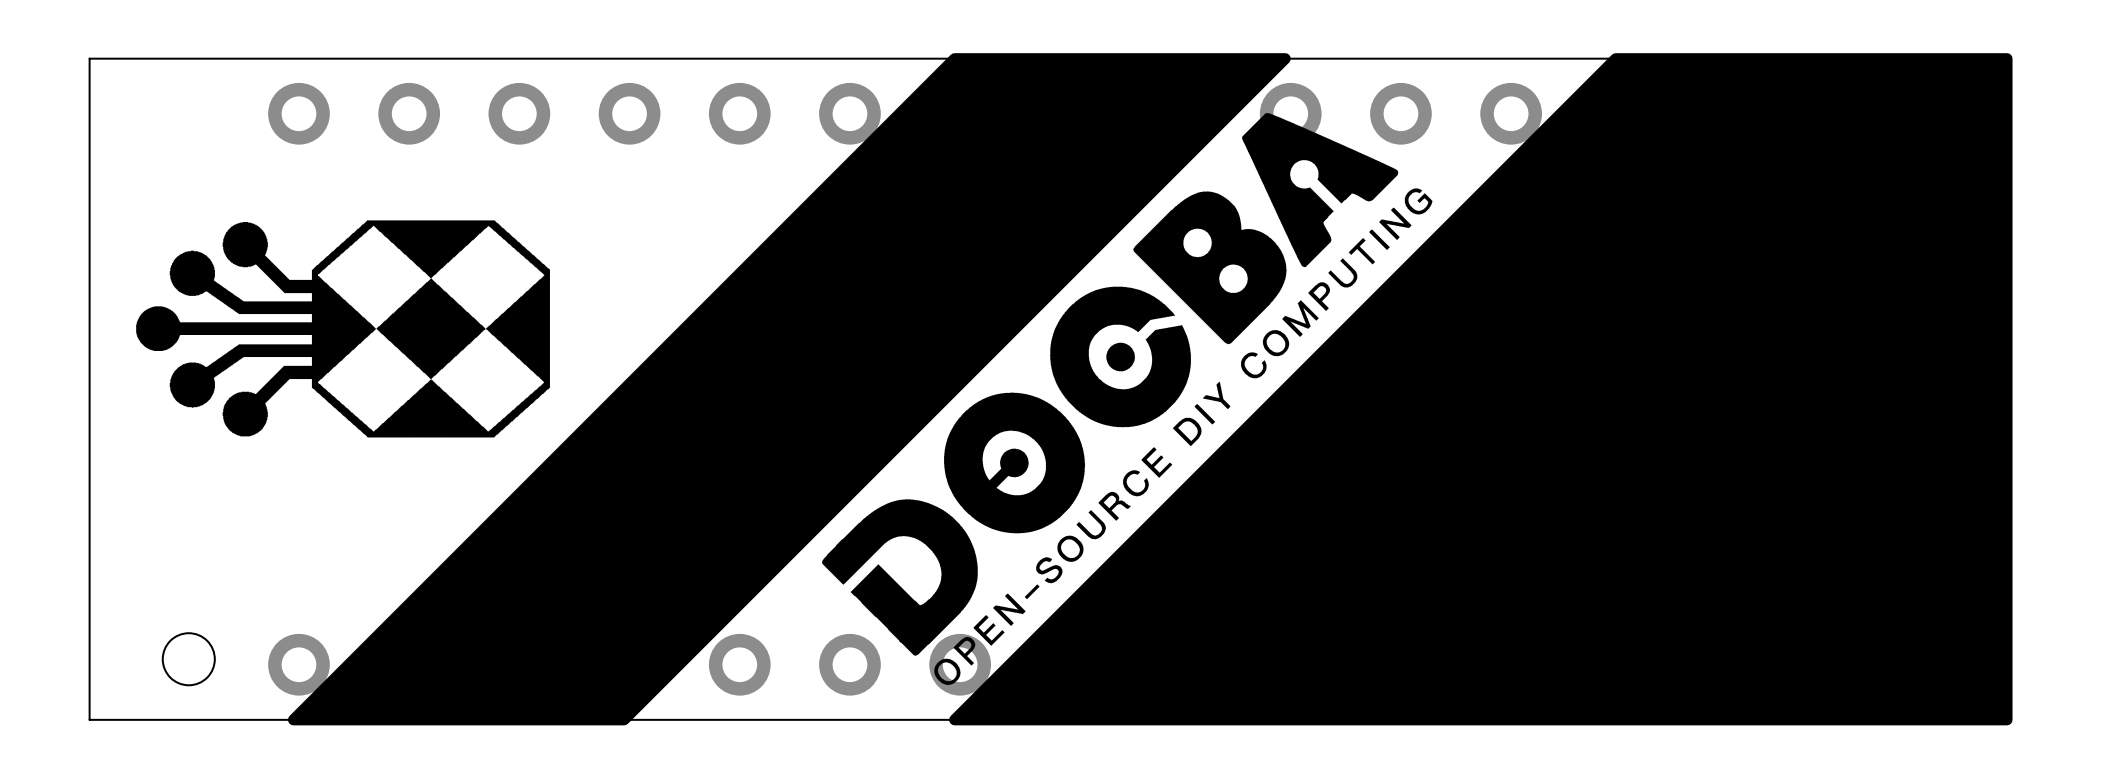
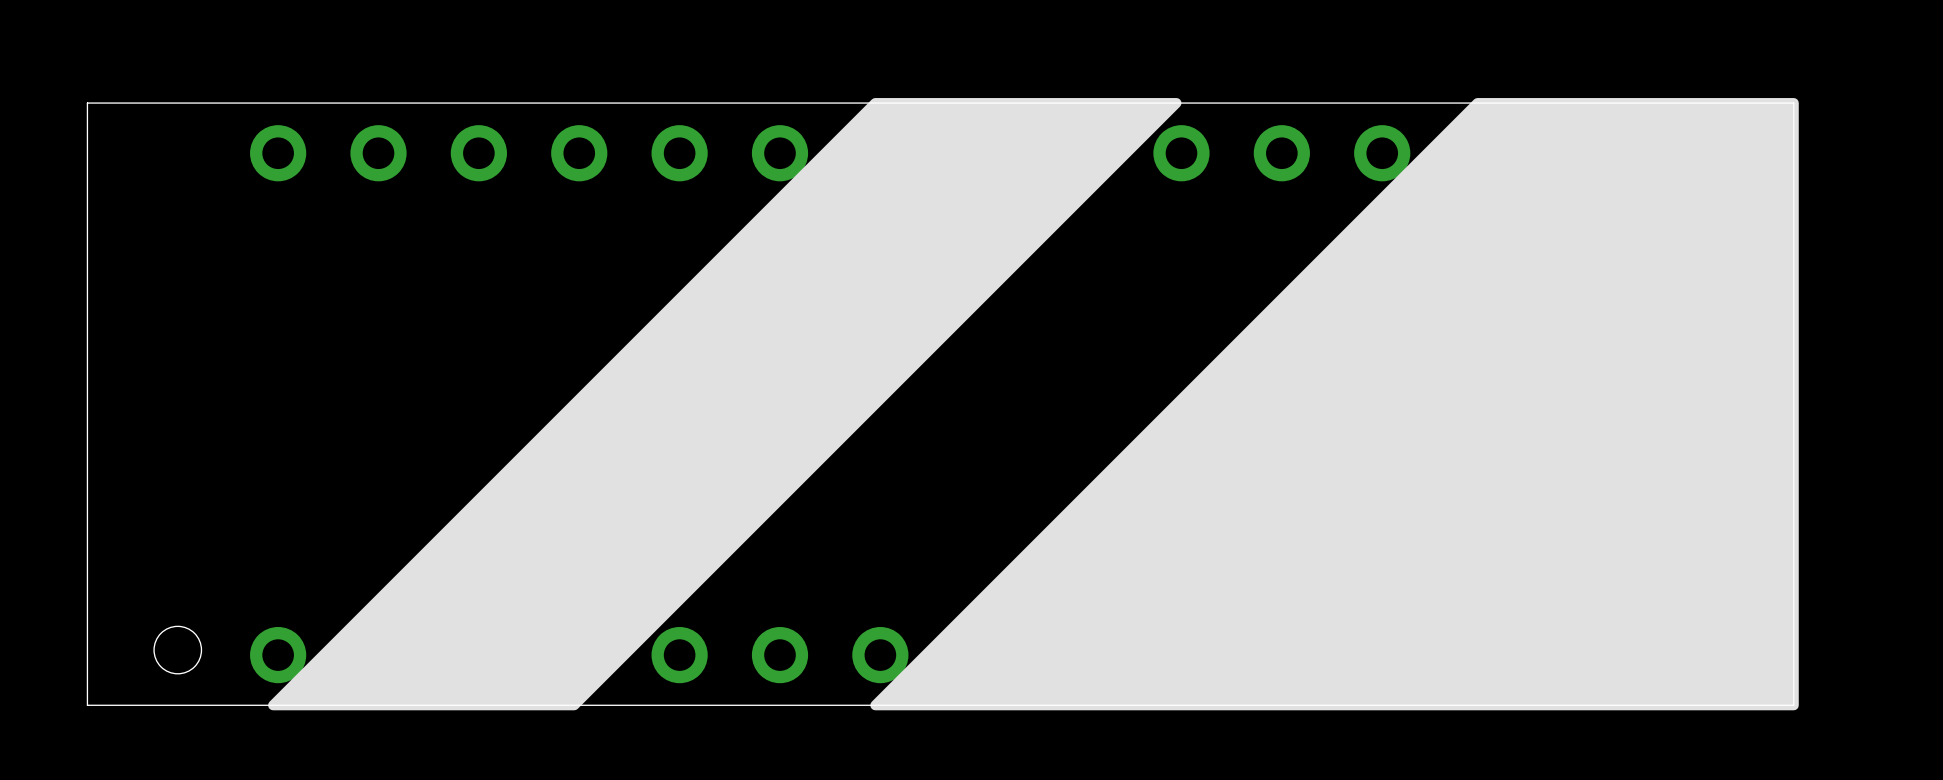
drawing shape: [949, 53, 2013, 726] -> [870, 98, 1799, 711]
drawing: [822, 113, 1433, 686] -> none
drawing: [136, 220, 550, 438] -> none

